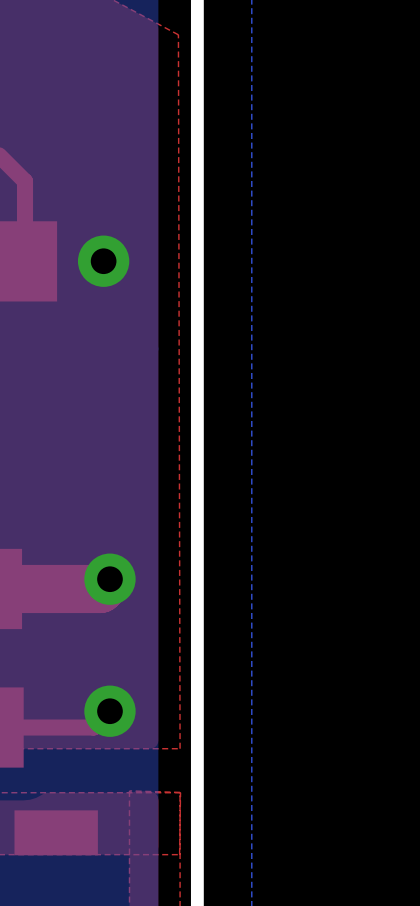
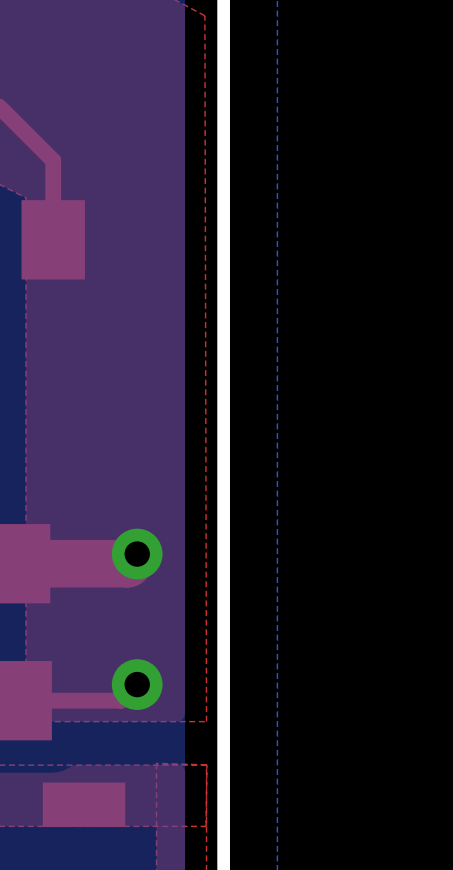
via: (103, 261) -> none

